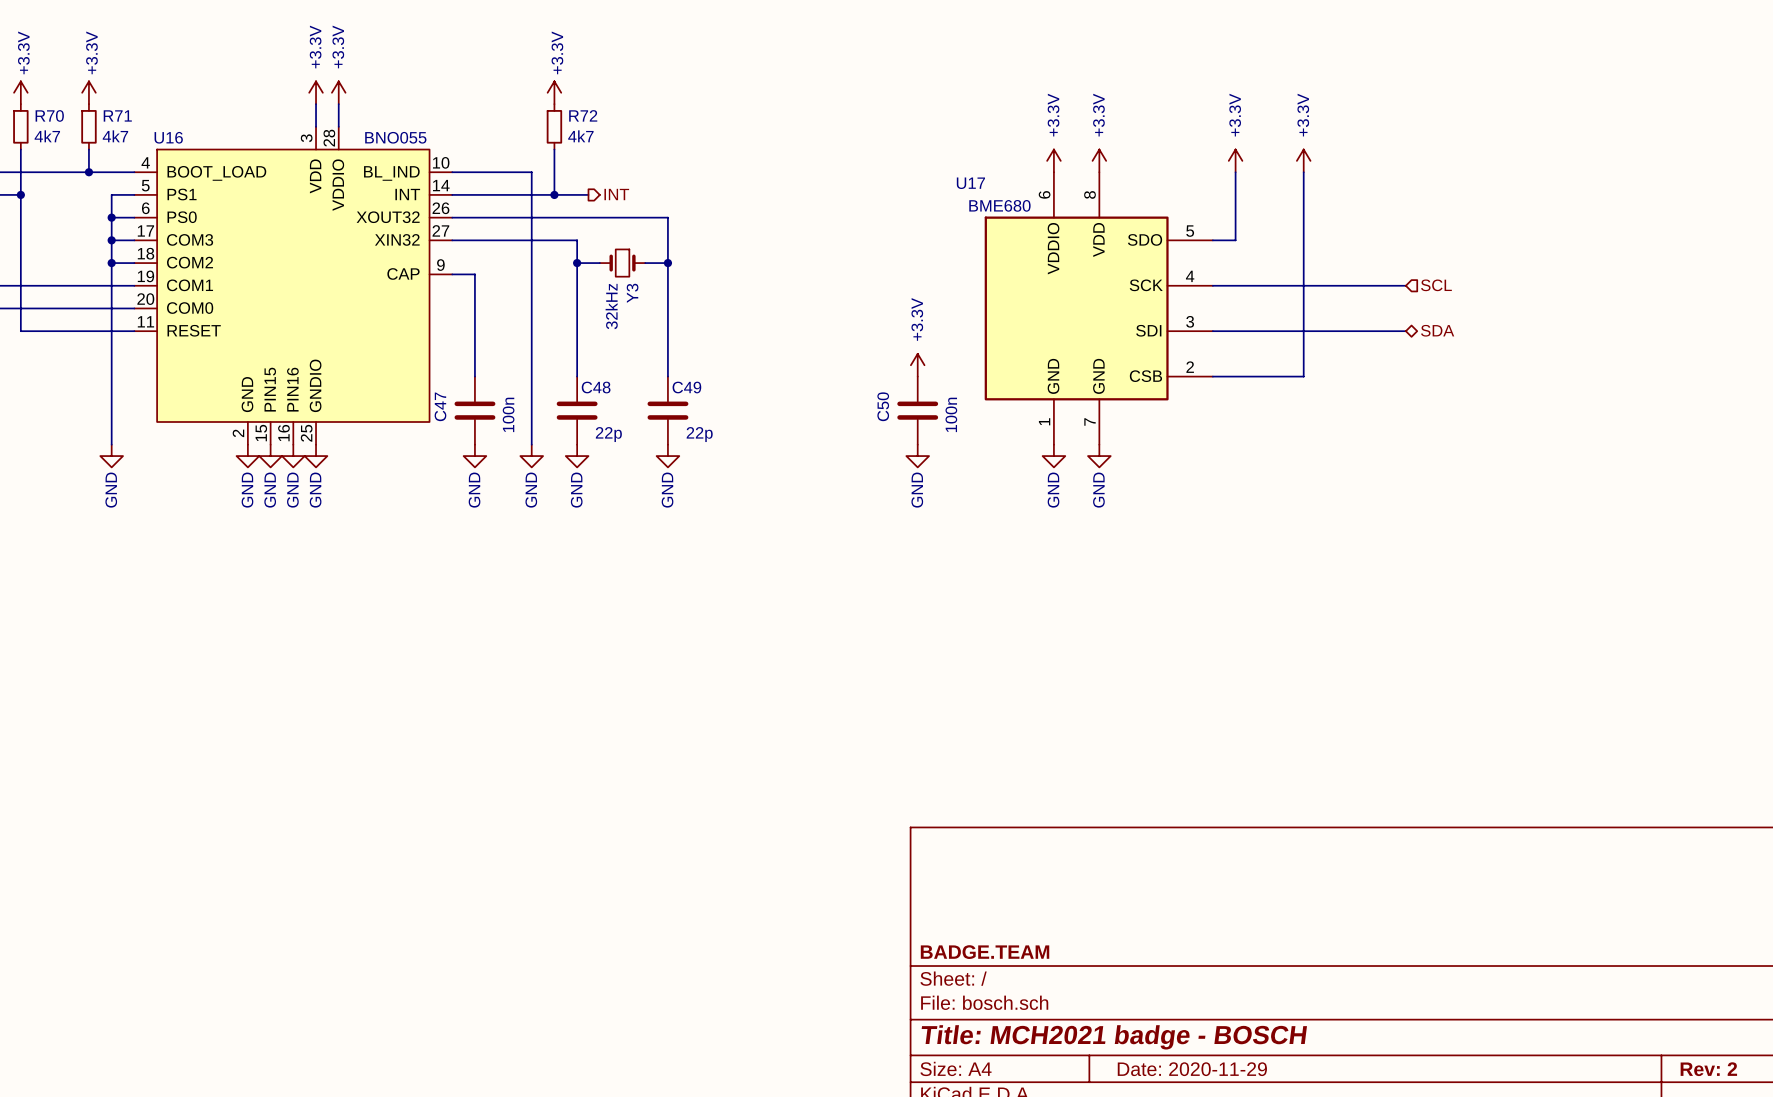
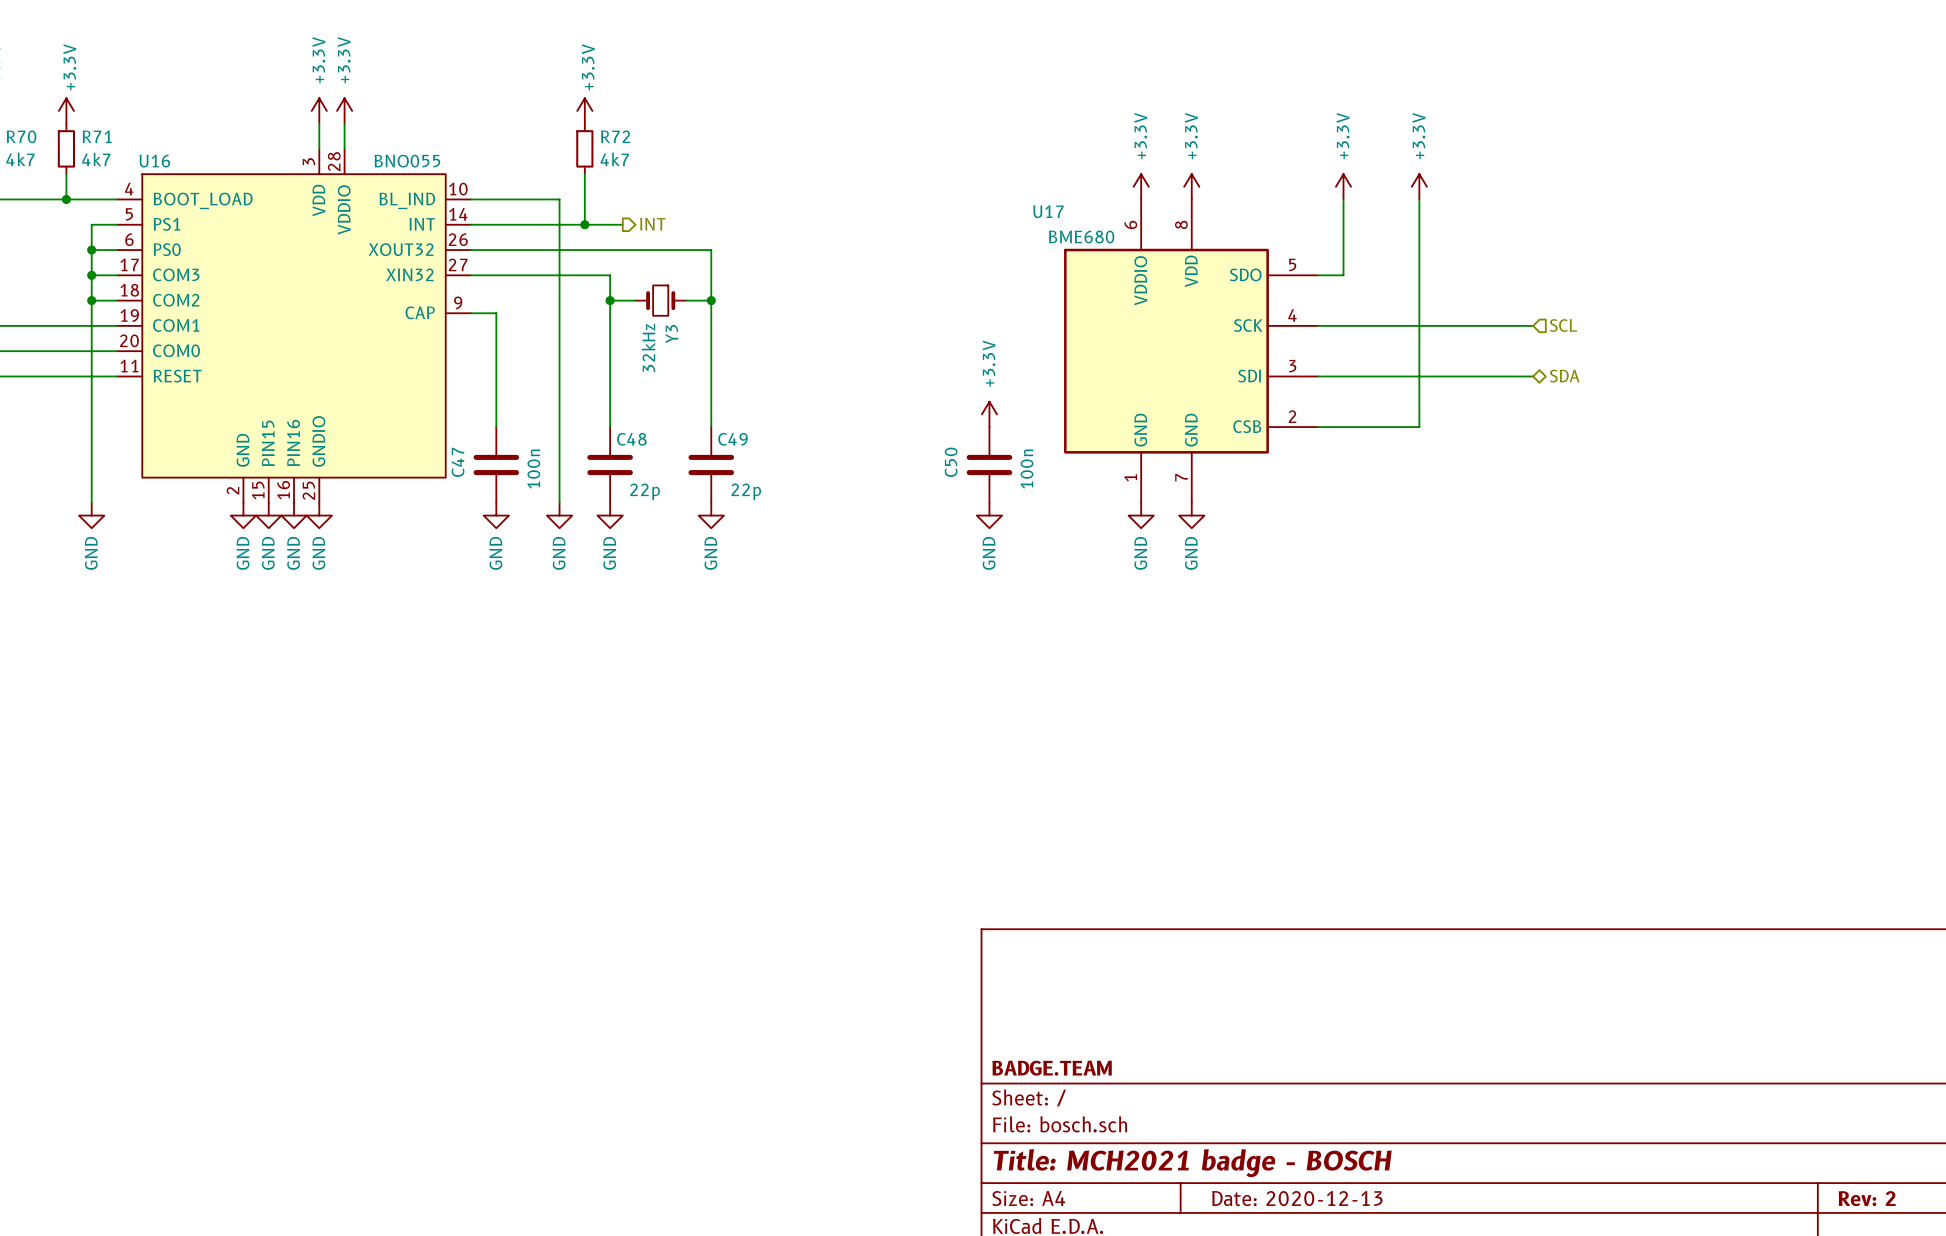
title block: Date: 2020-11-29 (1192, 1069) -> Date: 2020-12-13 (1297, 1198)

